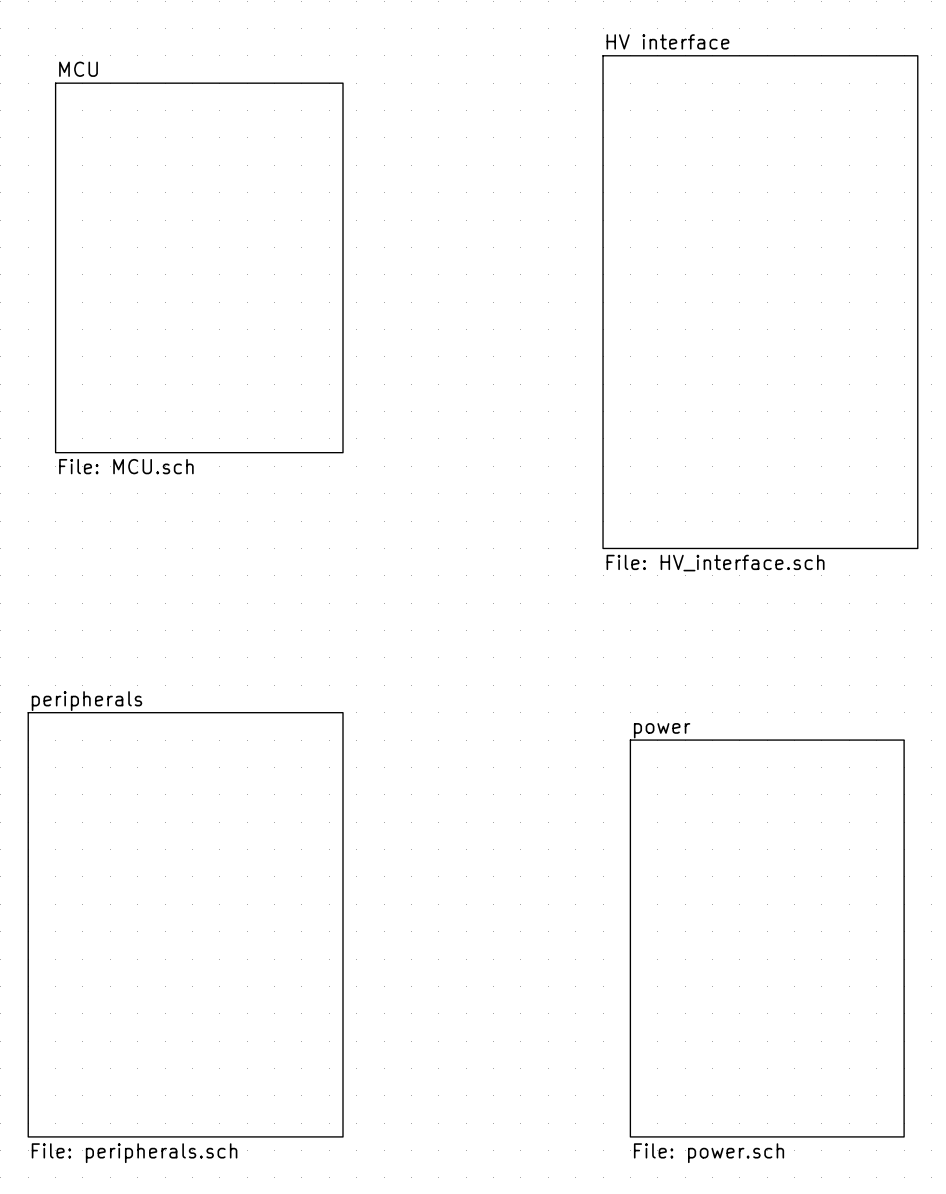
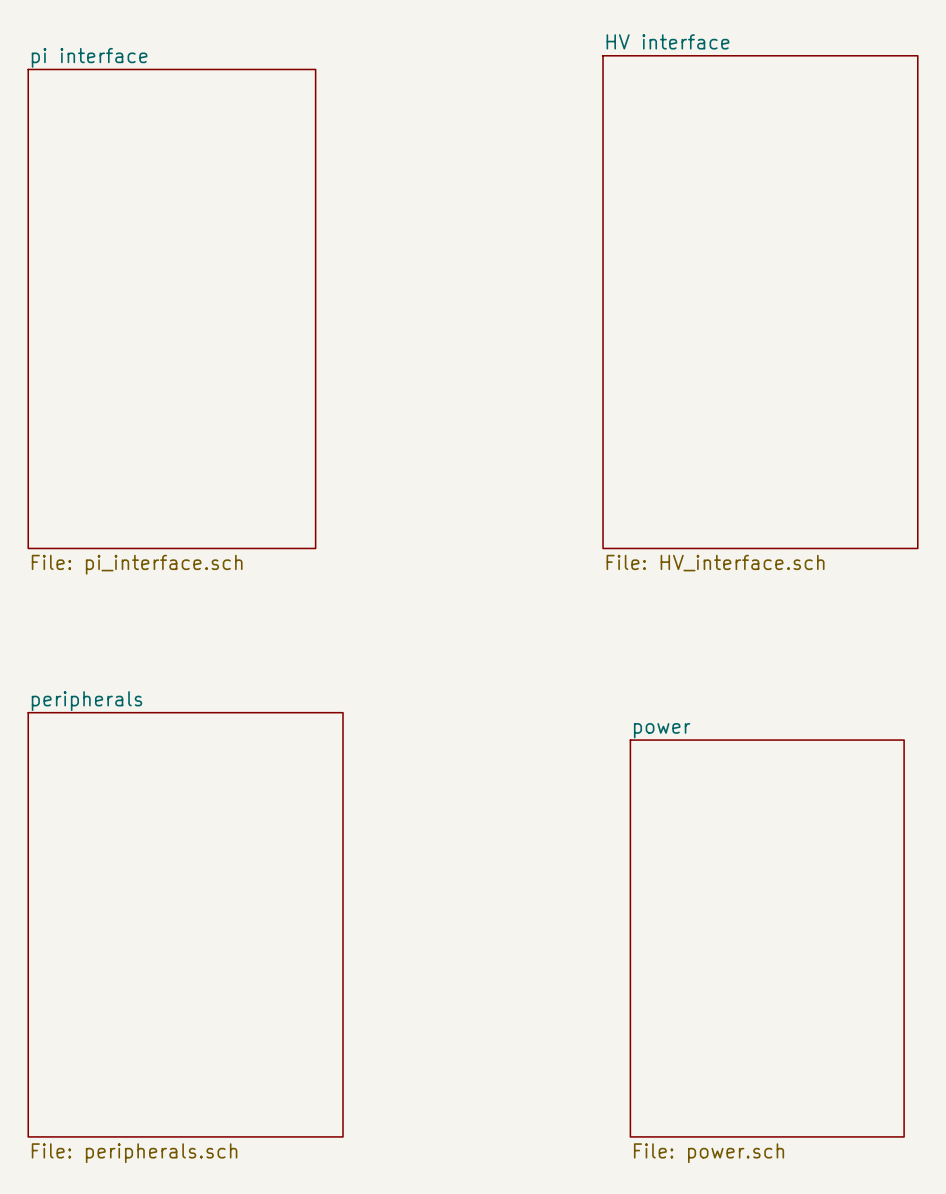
sheet MCU: File: MCU.sch (199, 267) -> none
sheet pi interface: none -> File: pi_interface.sch (171, 308)

